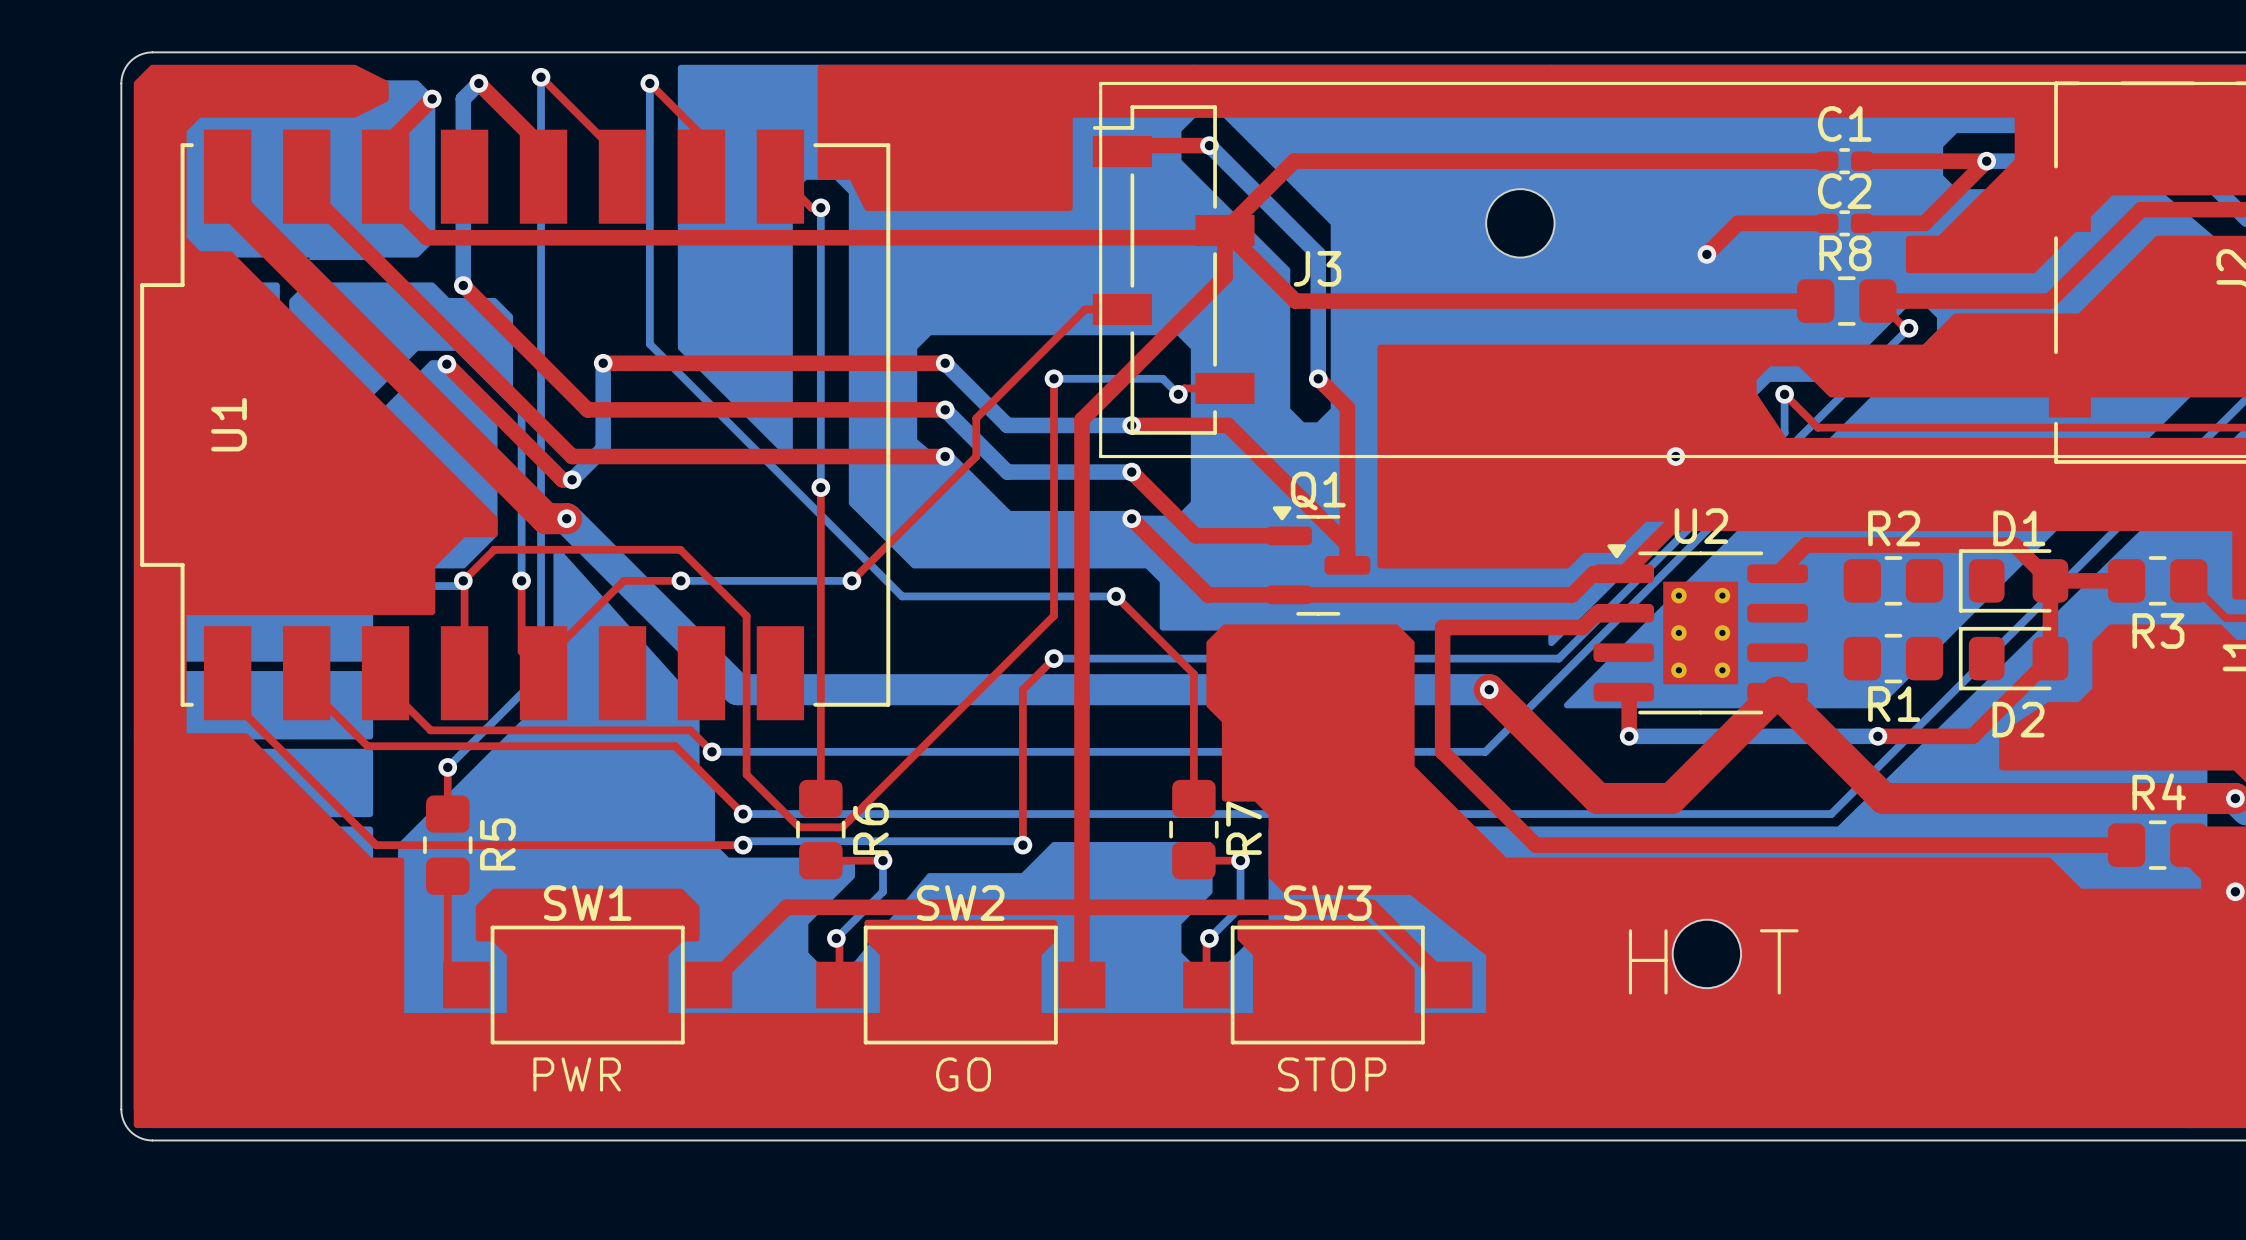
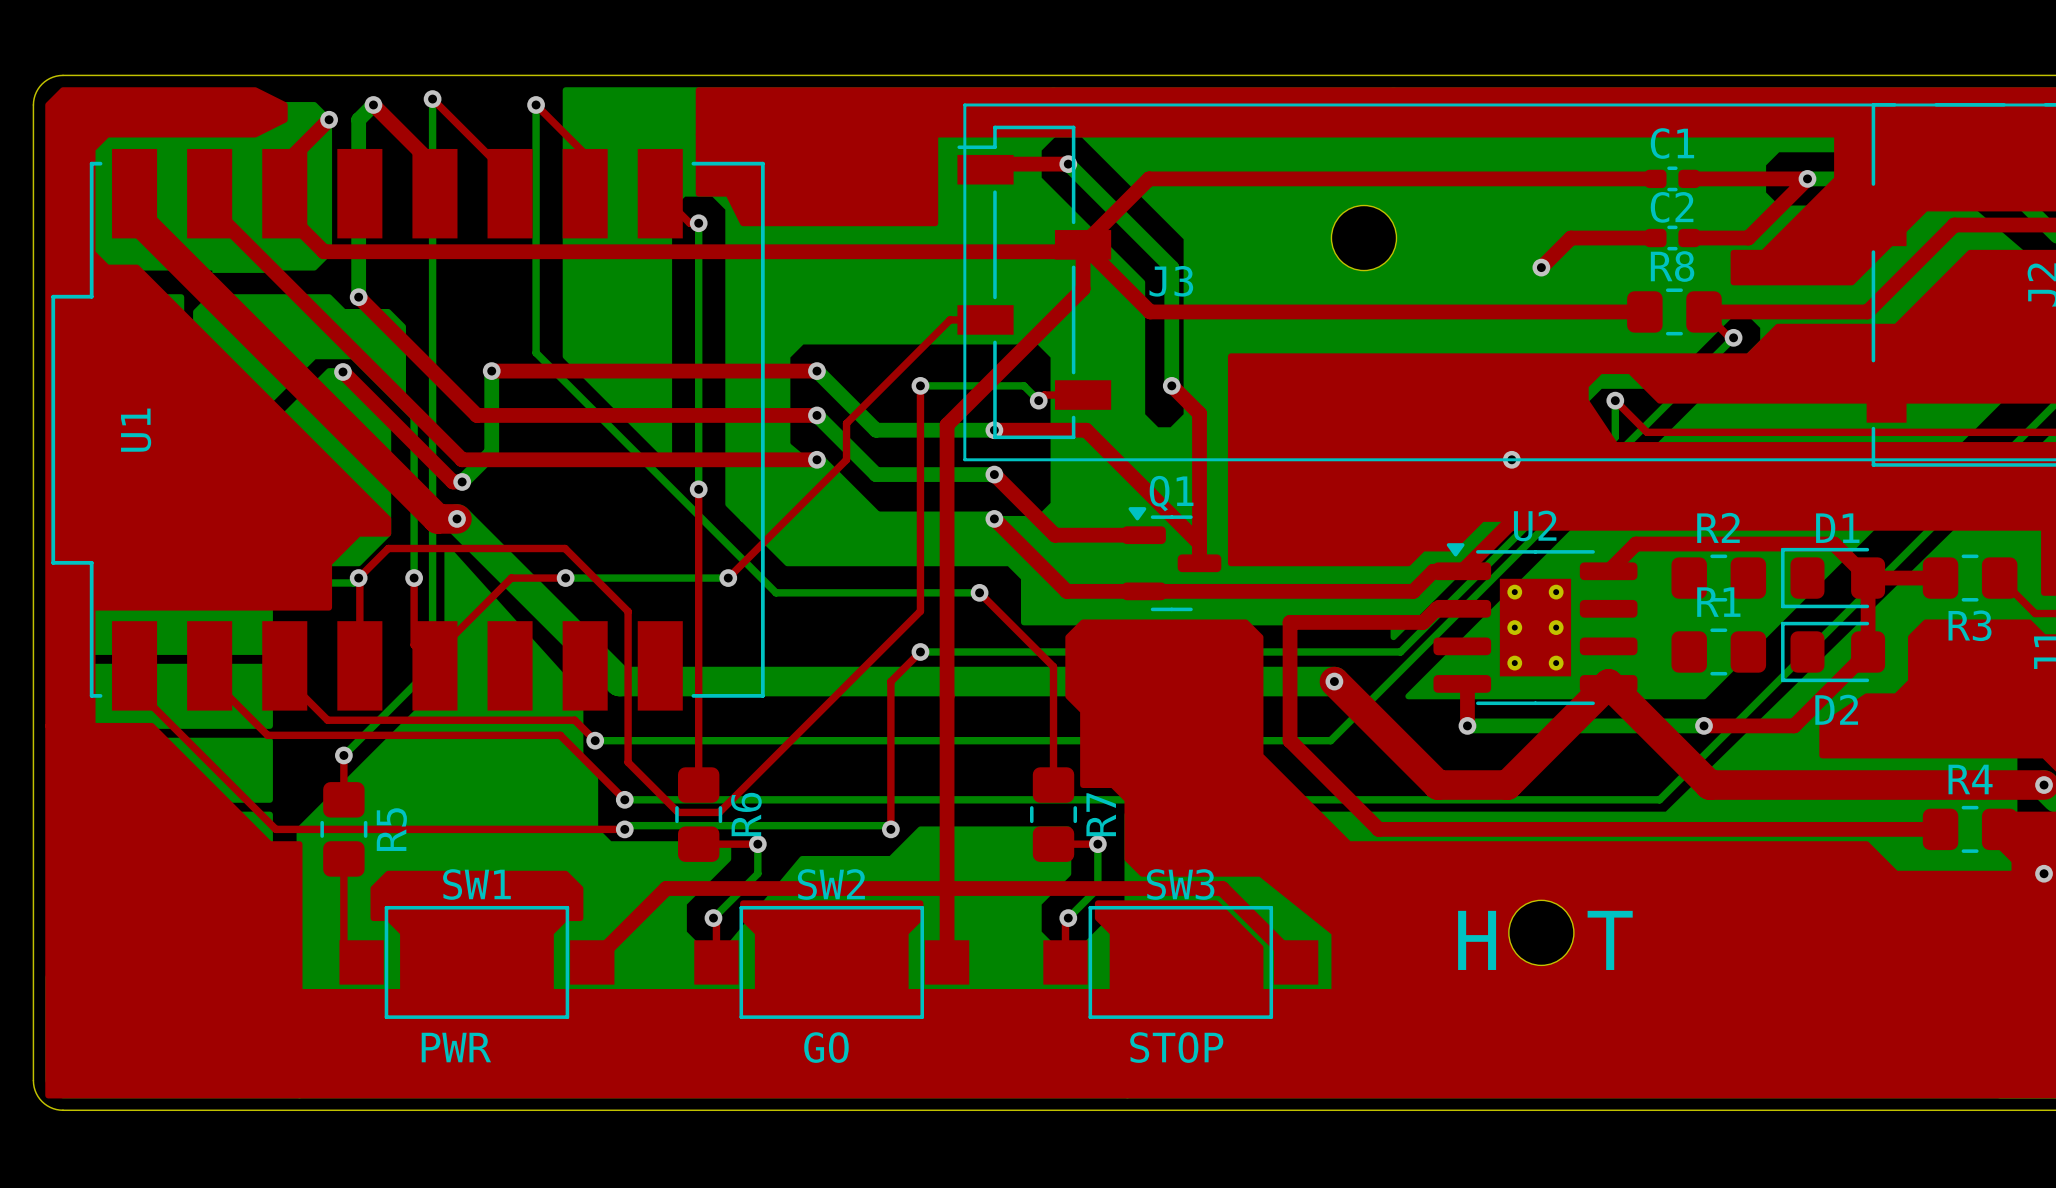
R1 name position: R1 (1894, 704) -> R1 (1718, 602)

